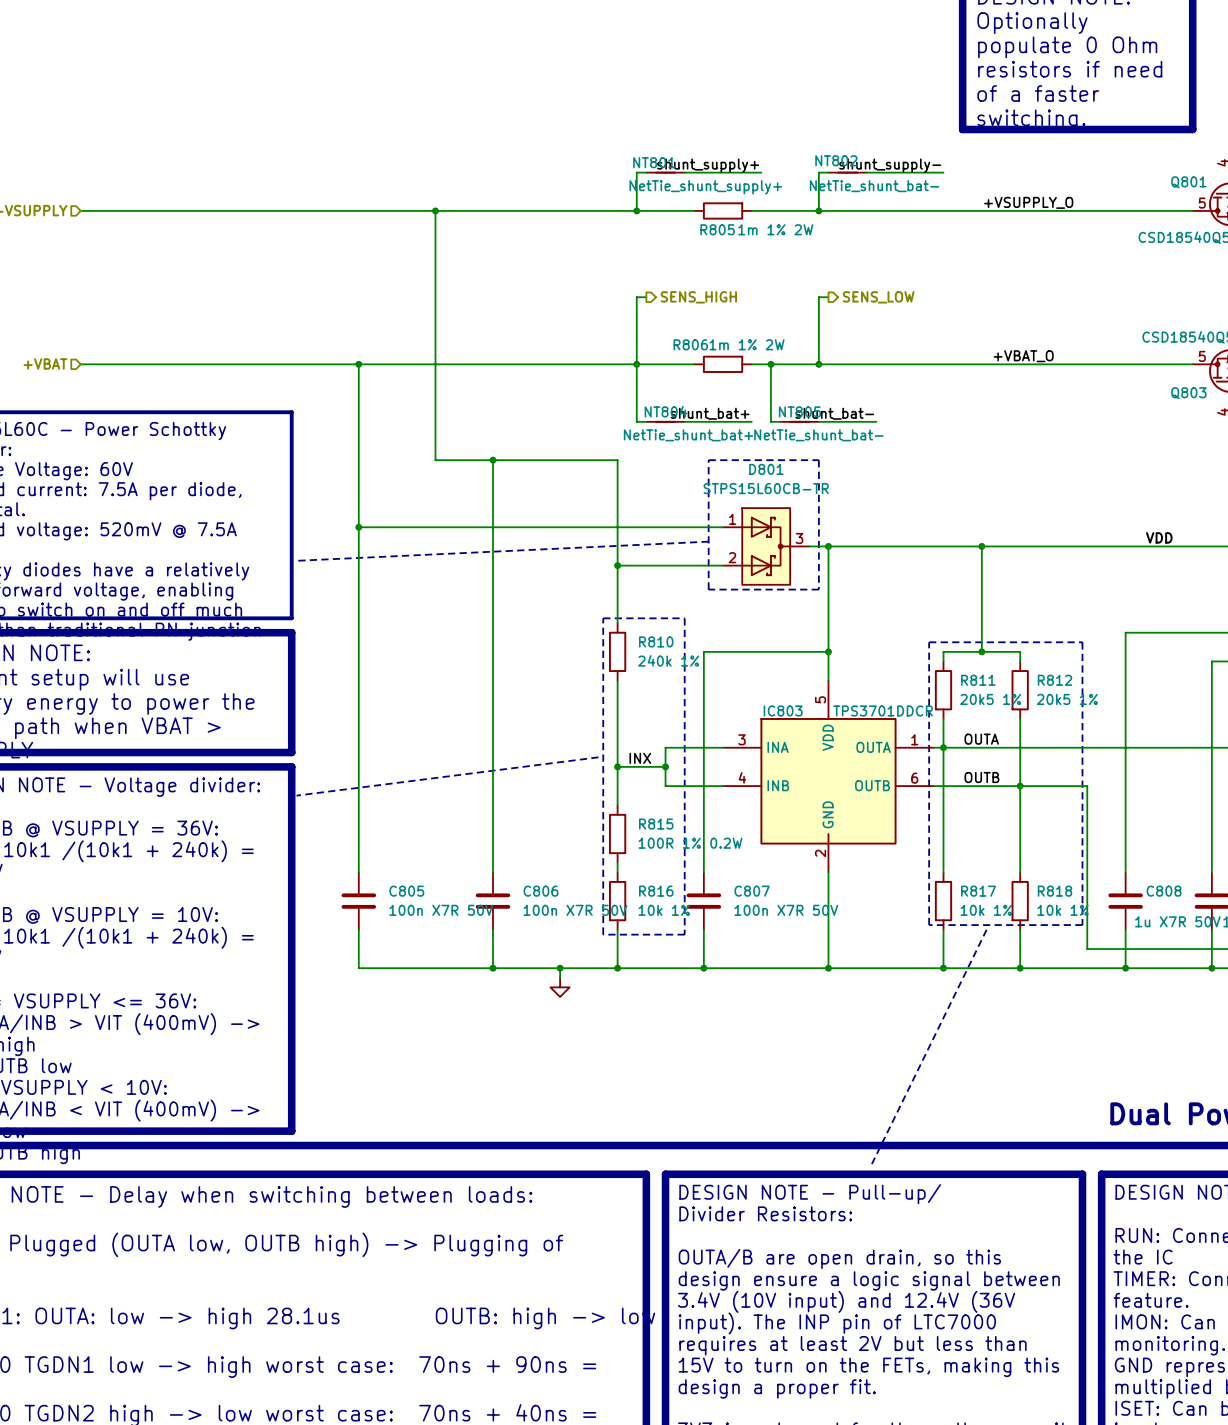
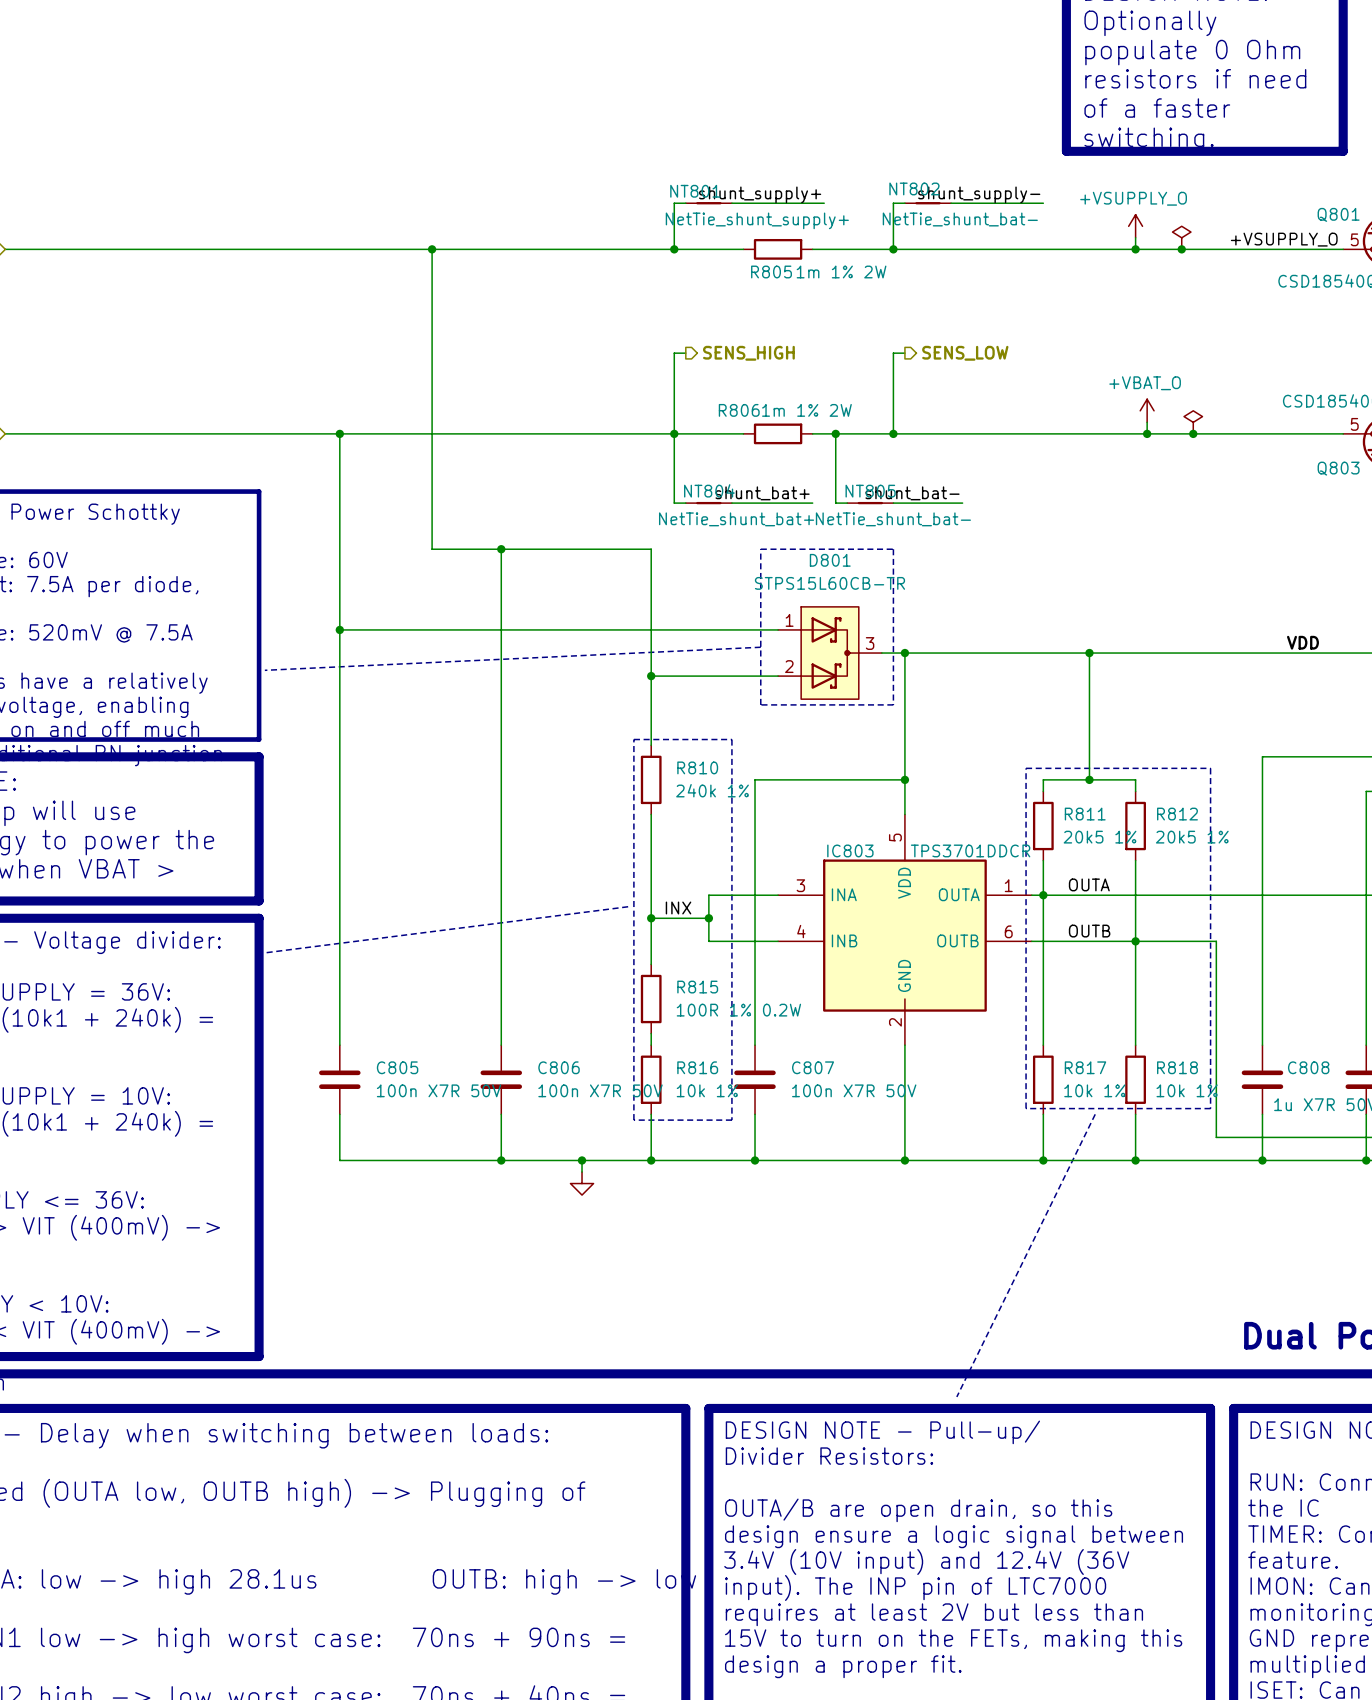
power symbol: none -> +VSUPPLY_O (1135, 226)
wire: none -> (1135, 237) (1135, 249)
power symbol: none -> (1181, 237)
label position: +VSUPPLY_O (1028, 202) -> +VSUPPLY_O (1284, 239)
junction: none -> (1135, 249)
junction: none -> (1181, 249)
power symbol: none -> +VBAT_O (1147, 410)
wire: none -> (1147, 422) (1147, 433)
power symbol: none -> (1193, 422)
label: +VBAT_O (1023, 356) -> none
junction: none -> (1147, 433)
junction: none -> (1193, 433)

